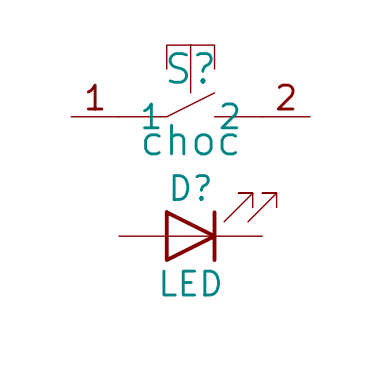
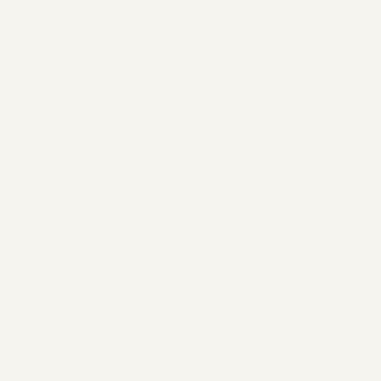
S?: choc (190, 80) -> none
D?: LED (197, 227) -> none

